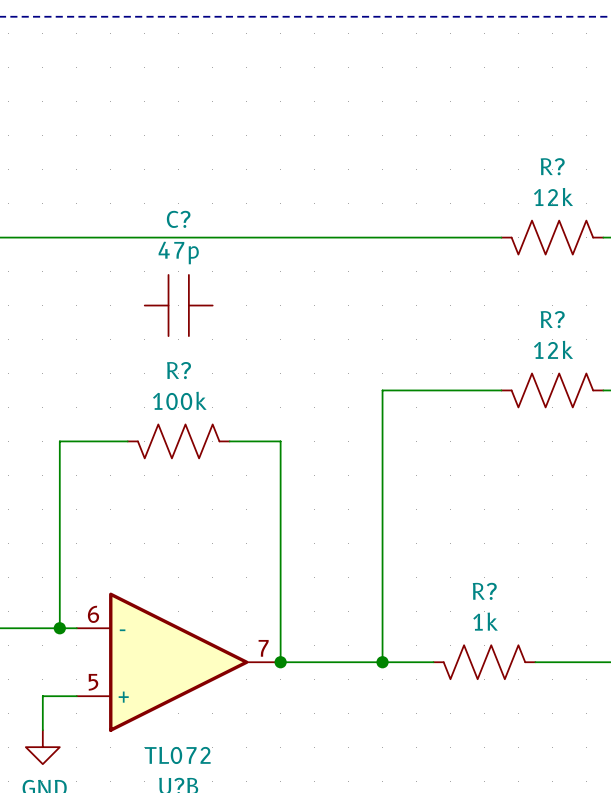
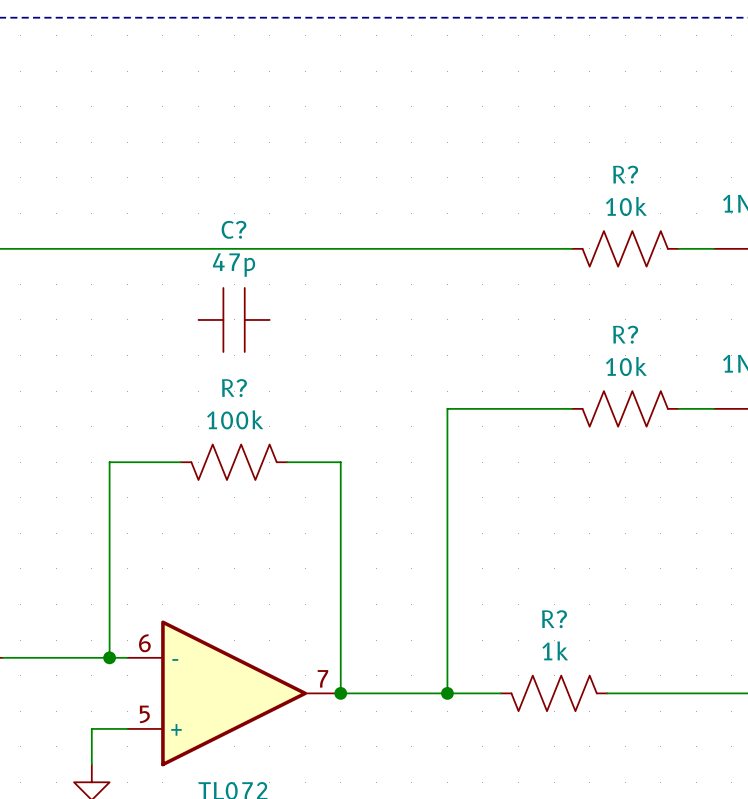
R? value: 12k (553, 196) -> 10k (626, 206)
R? value: 12k (553, 349) -> 10k (626, 366)

